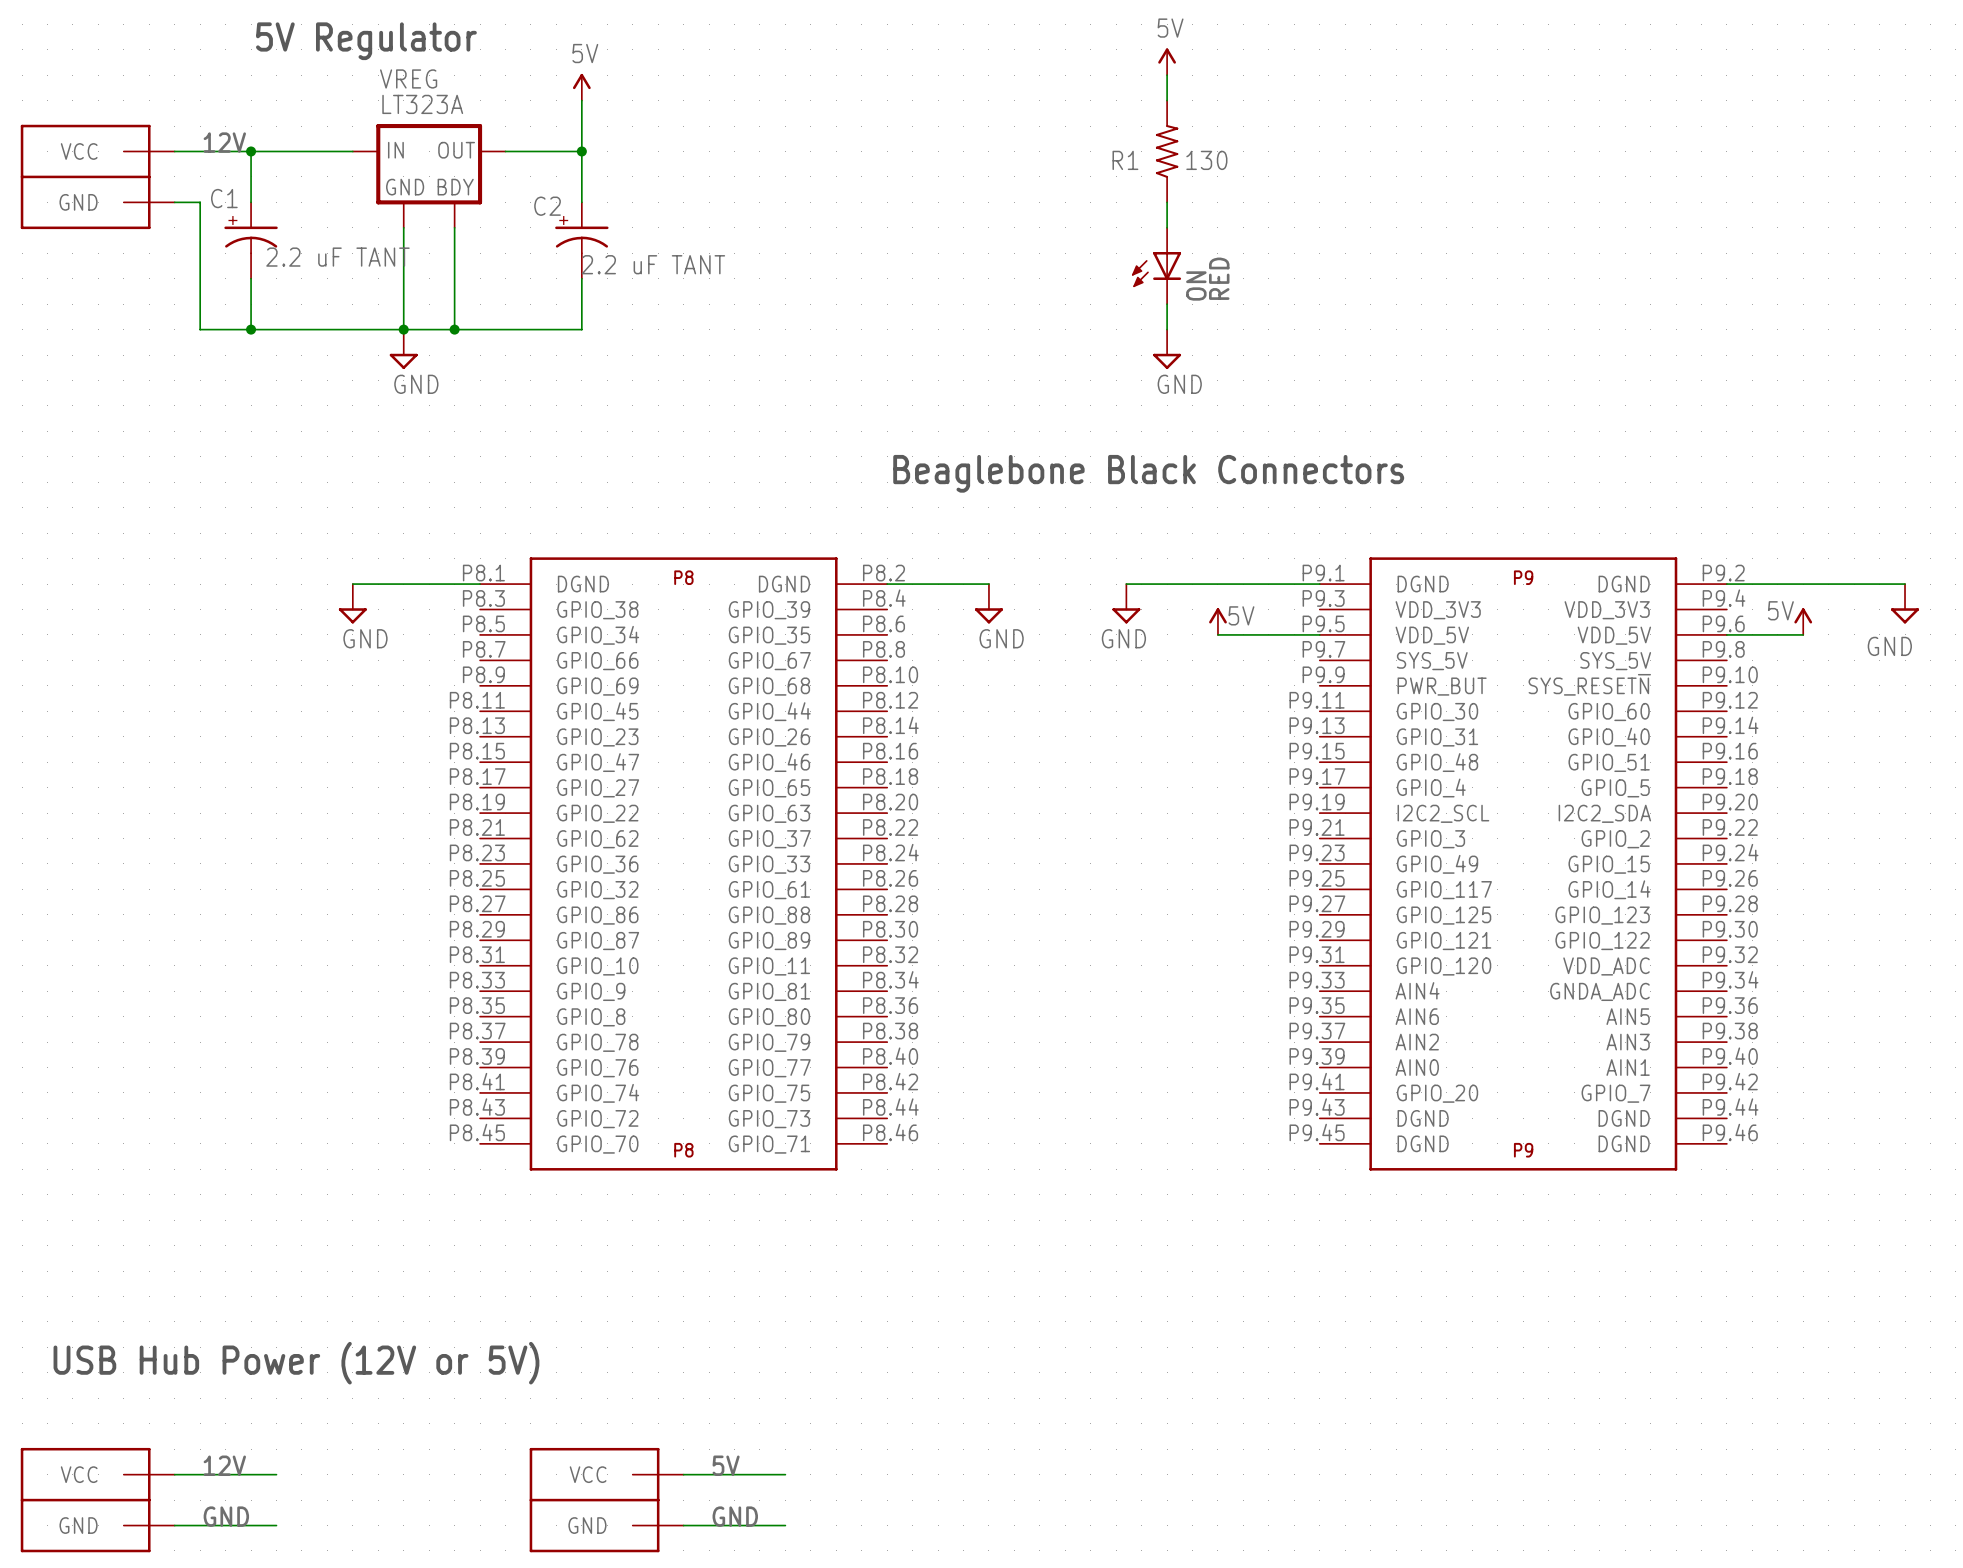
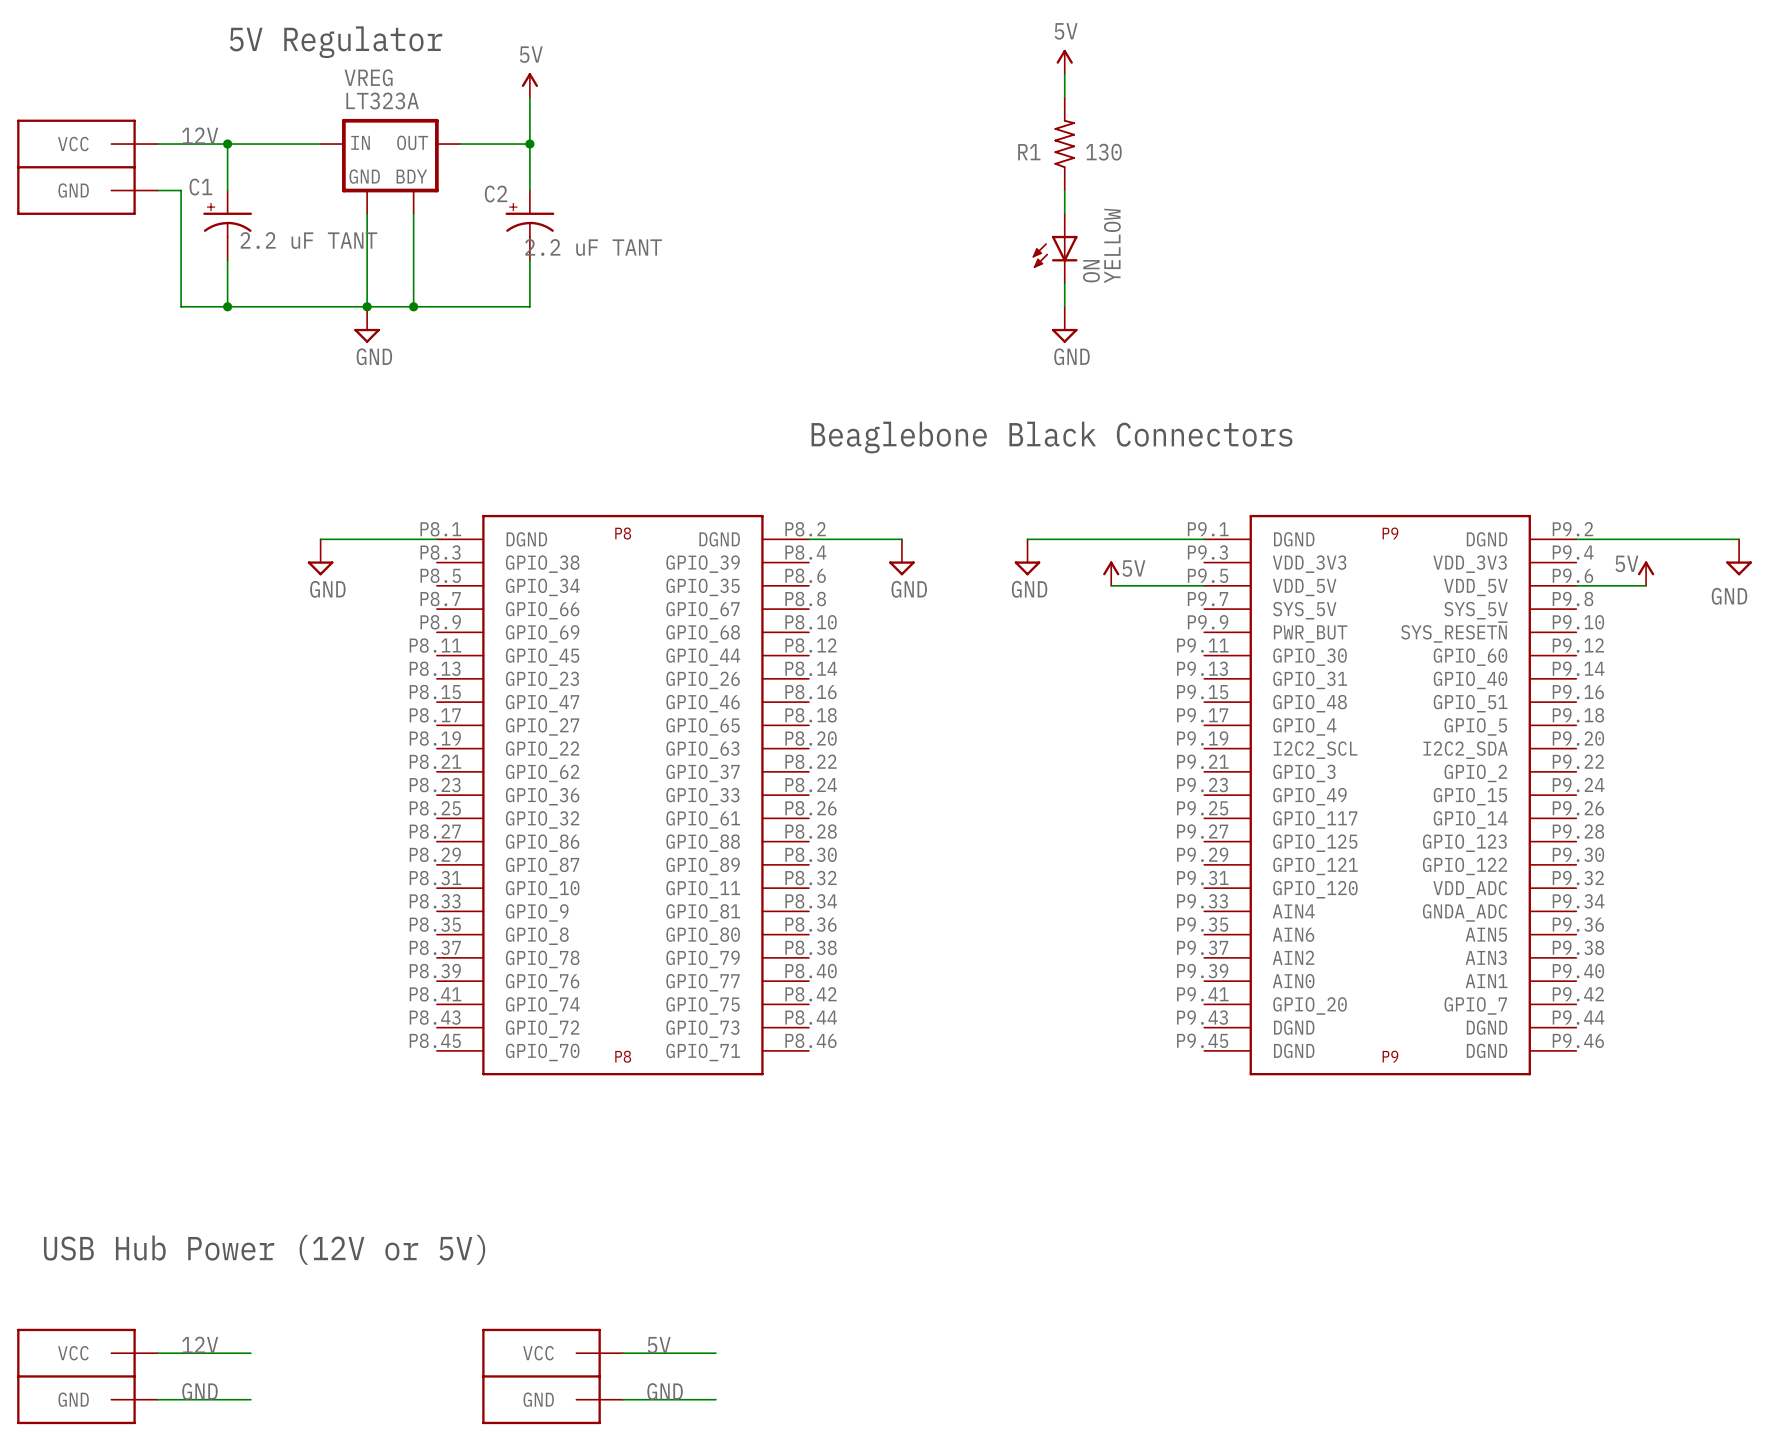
ON value: RED (1219, 278) -> YELLOW (1112, 245)

